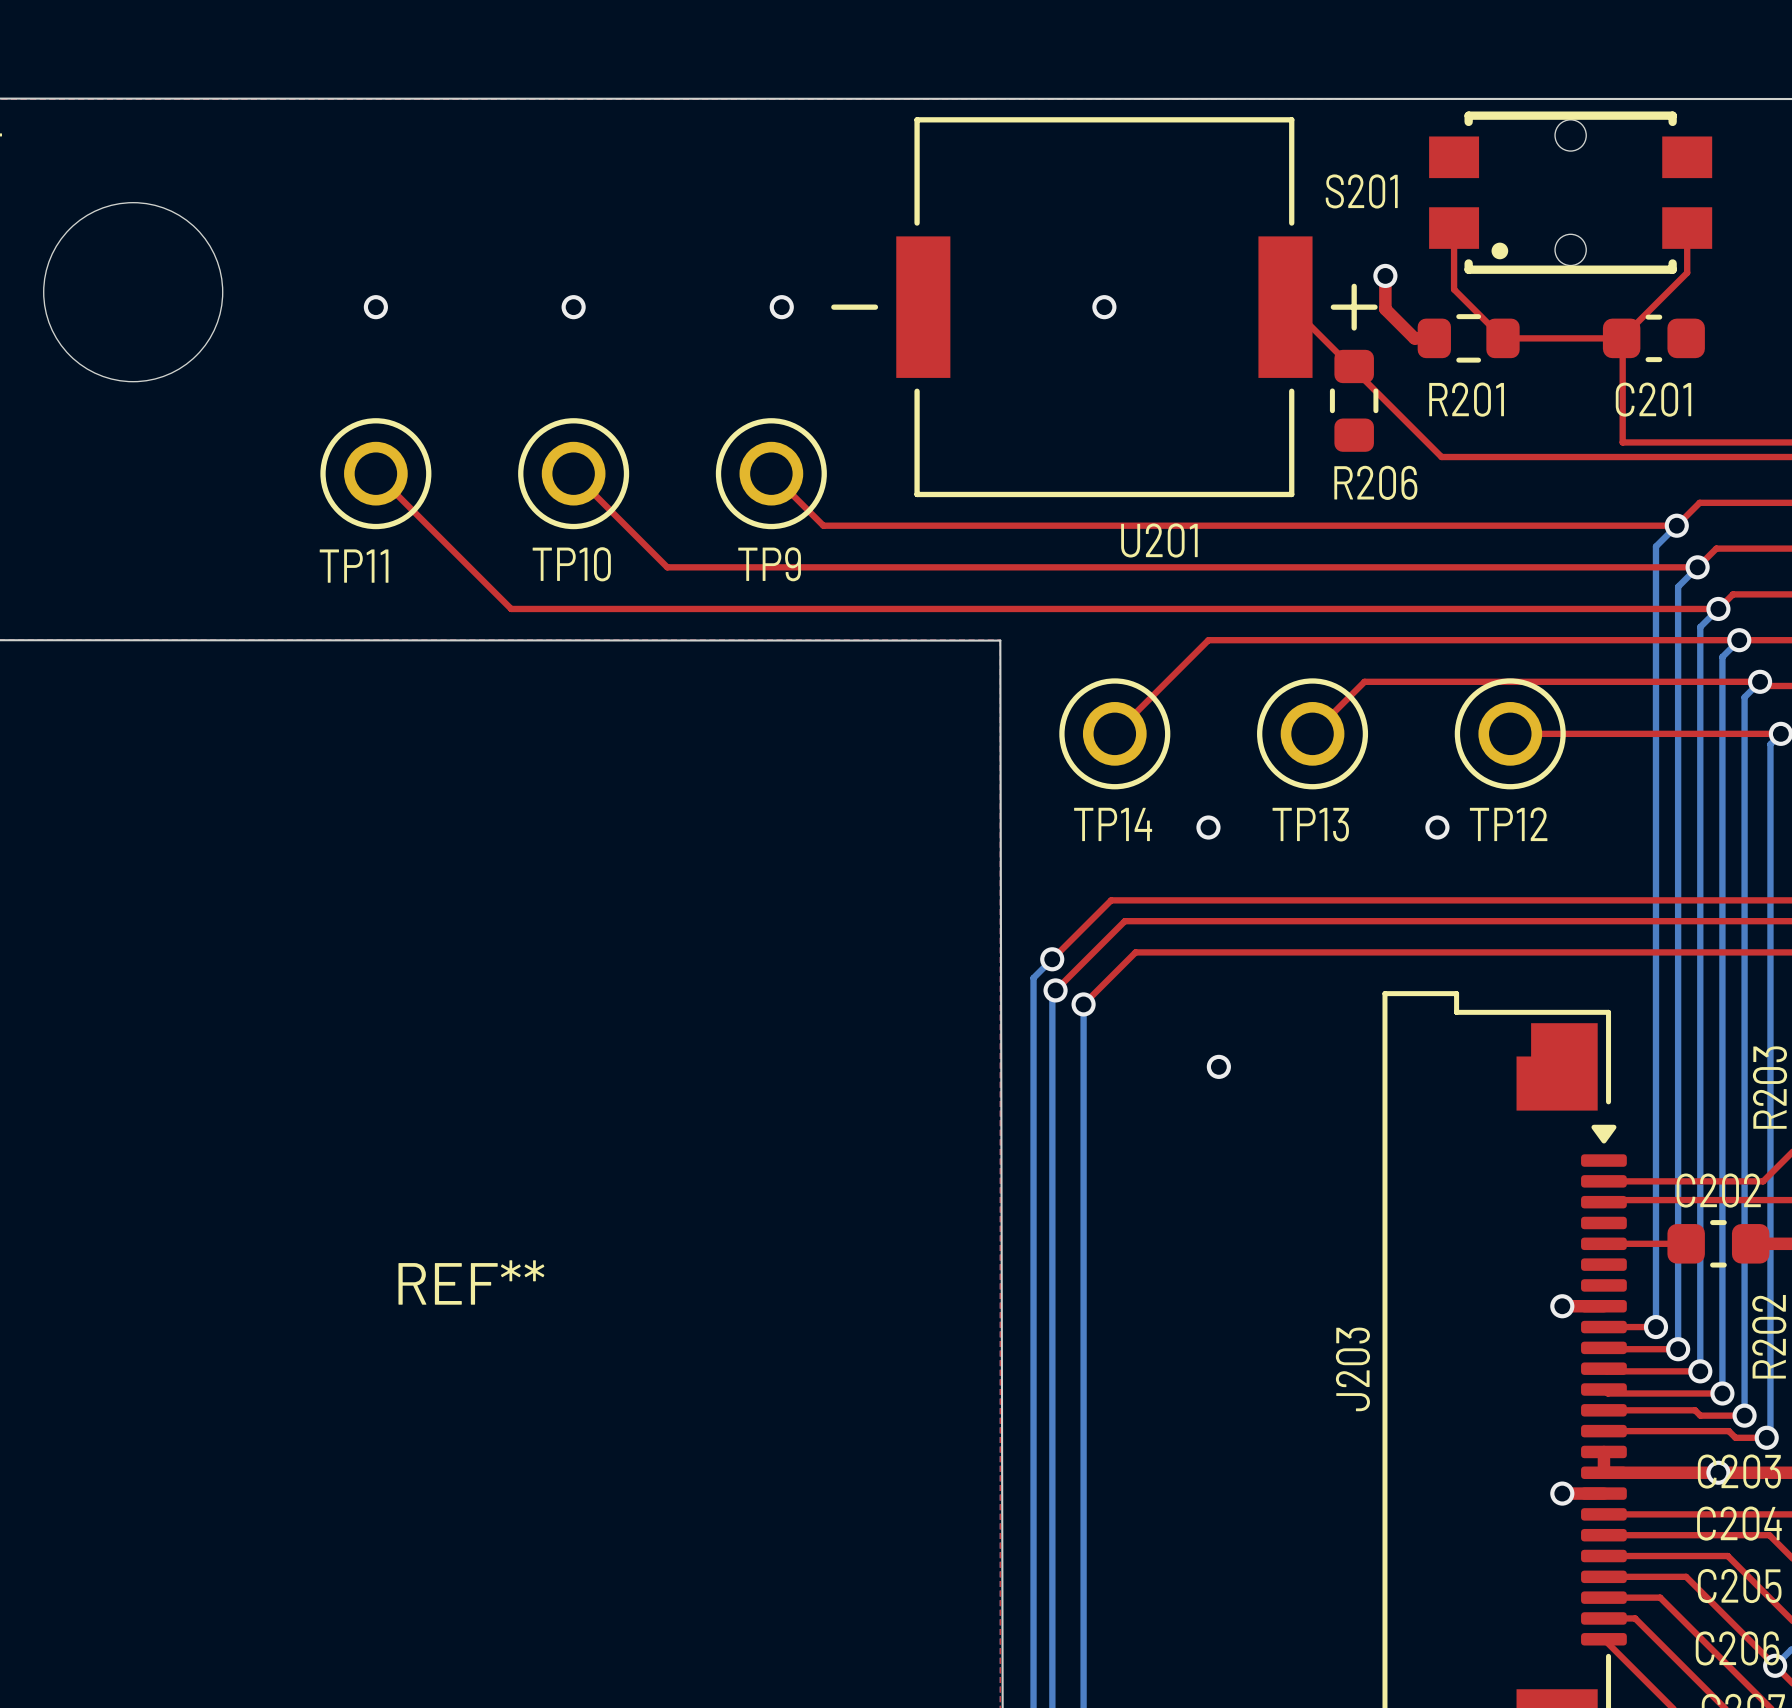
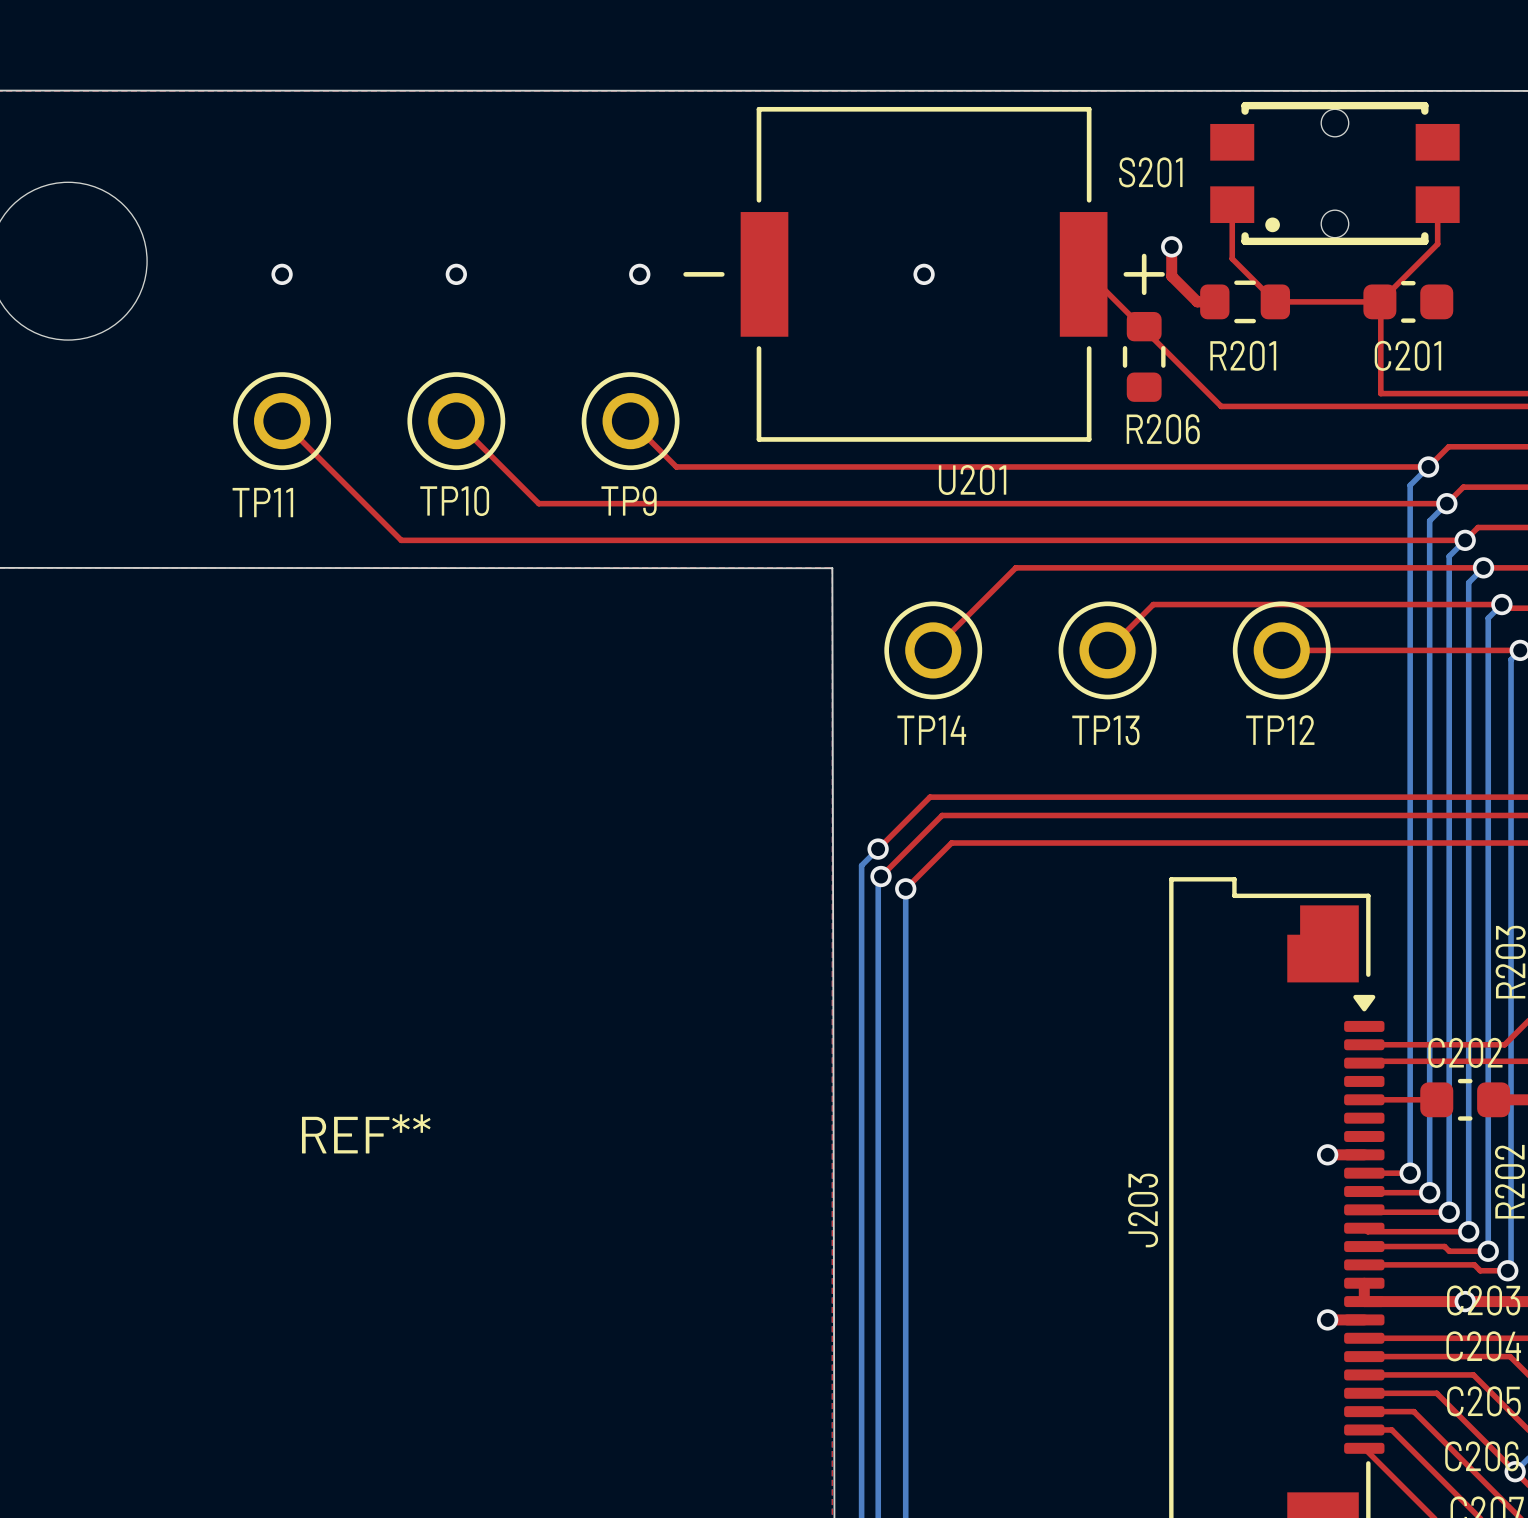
via: (1208, 827) -> none
via: (1437, 827) -> none
via: (1218, 1066) -> none

